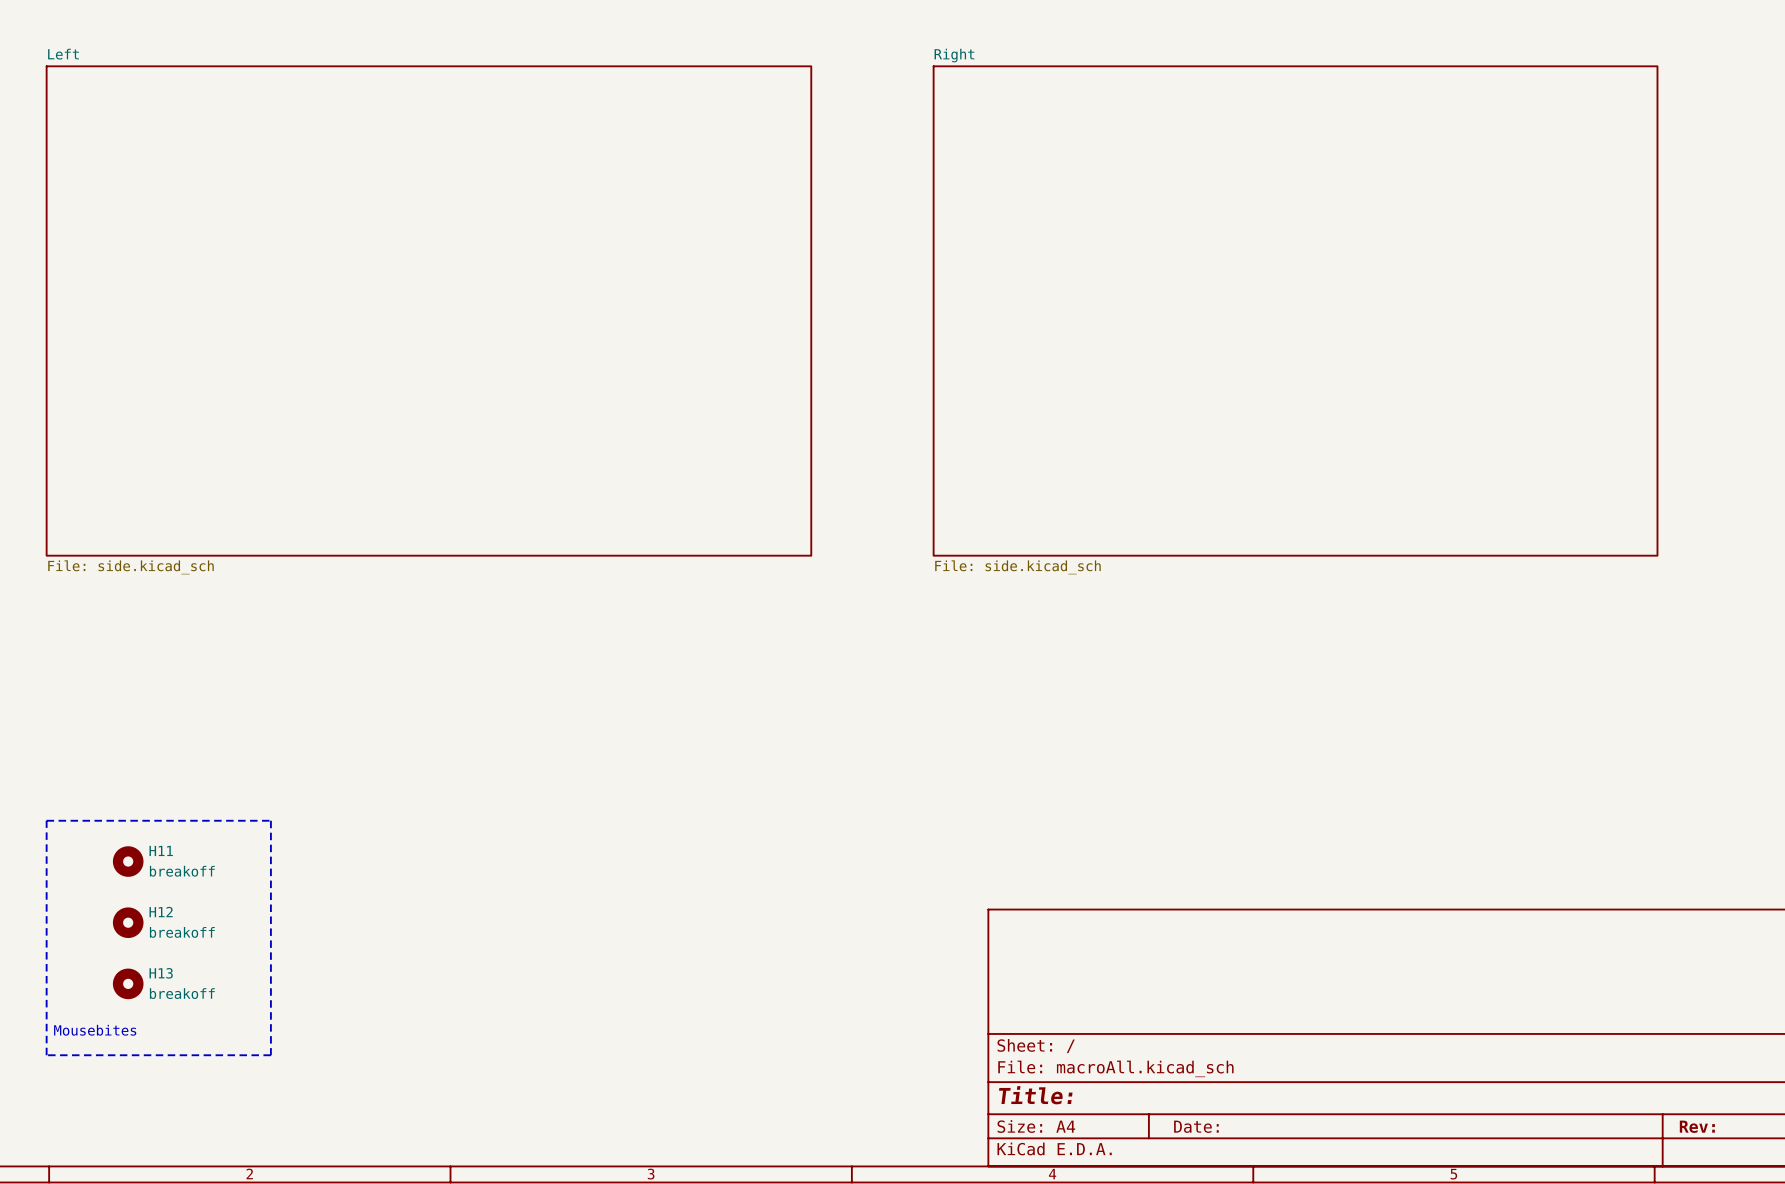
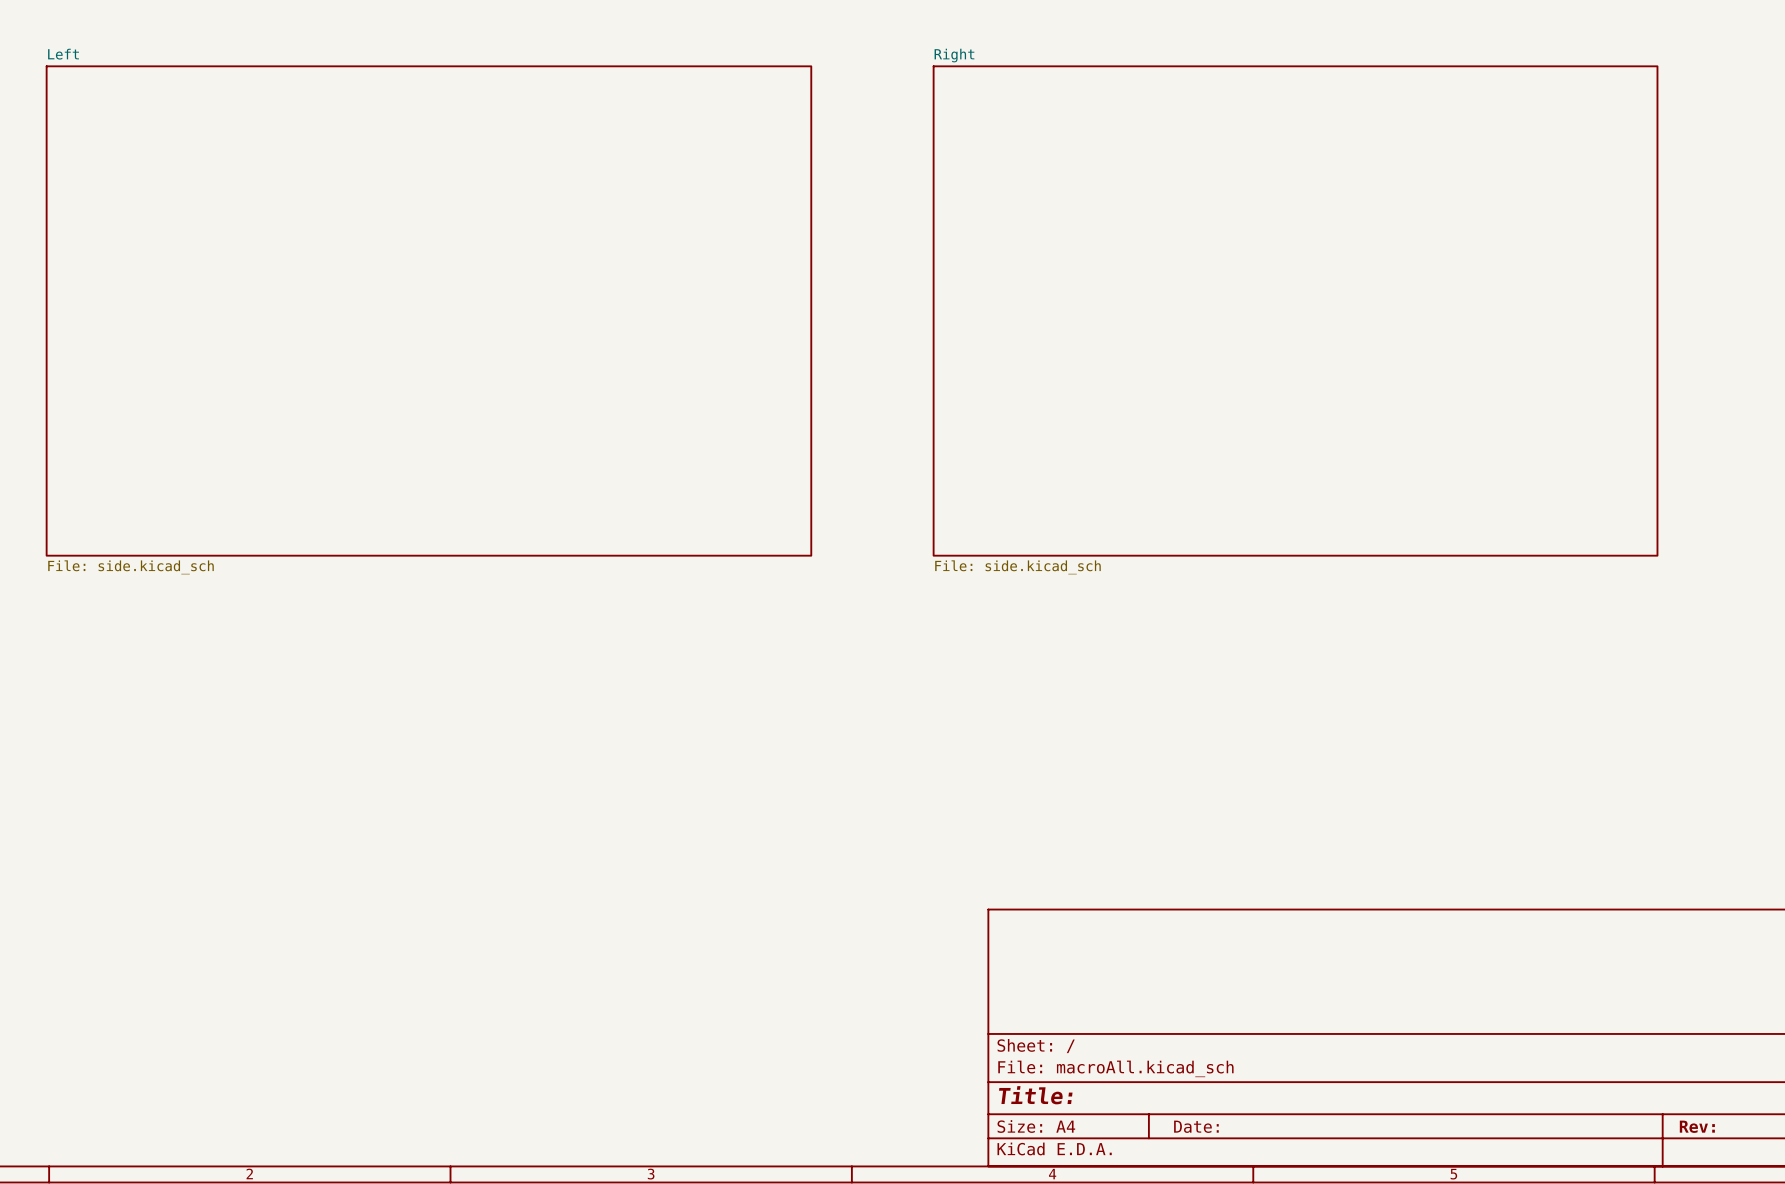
line: (46, 820) (270, 820) (270, 1055) (46, 1055) (46, 820) -> none
H11: breakoff (128, 861) -> none
H12: breakoff (128, 922) -> none
H13: breakoff (128, 983) -> none
text: Mousebites (95, 1030) -> none

